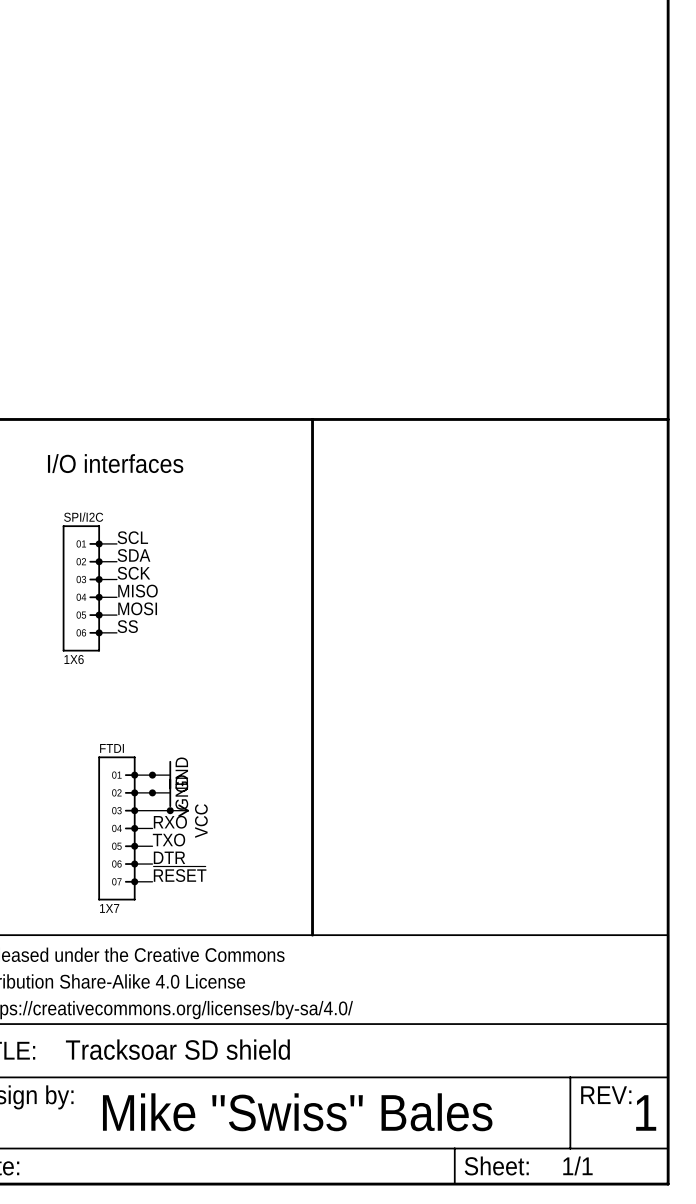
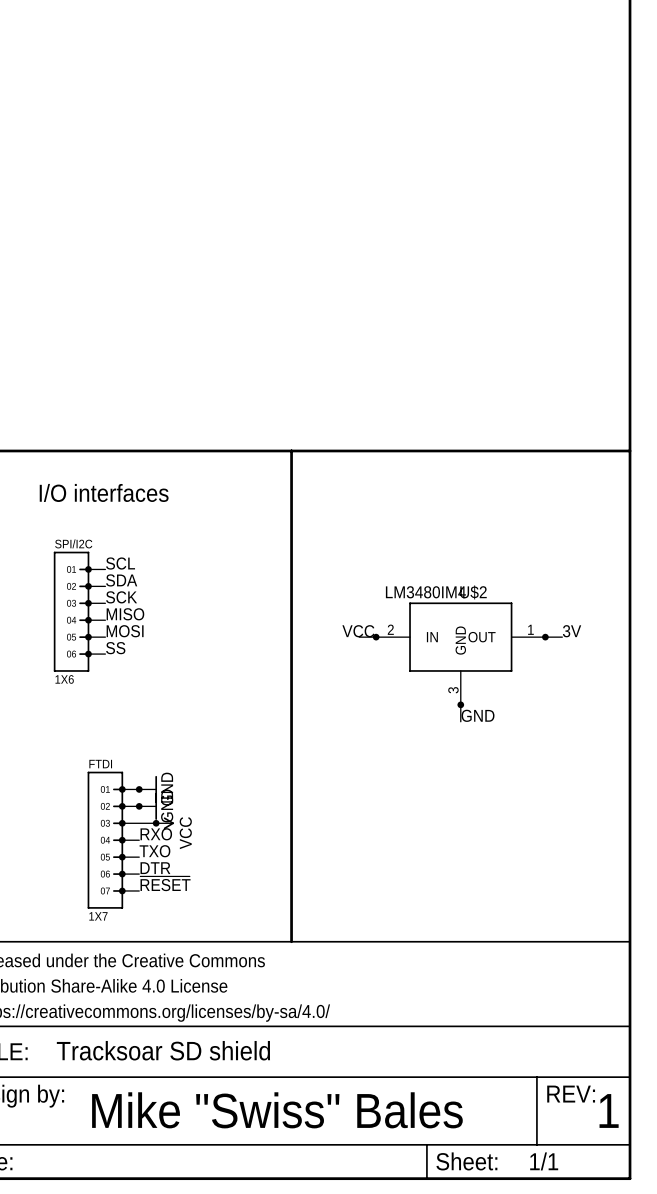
label: none -> VCC (358, 631)
label: none -> 3V (572, 631)
wire: none -> (359, 637) (376, 637)
junction: none -> (376, 637)
wire: none -> (545, 637) (562, 637)
junction: none -> (545, 637)
U$2: none -> LM3480IM4 (460, 653)
wire: none -> (460, 704) (460, 721)
junction: none -> (460, 704)
label: none -> GND (478, 715)

